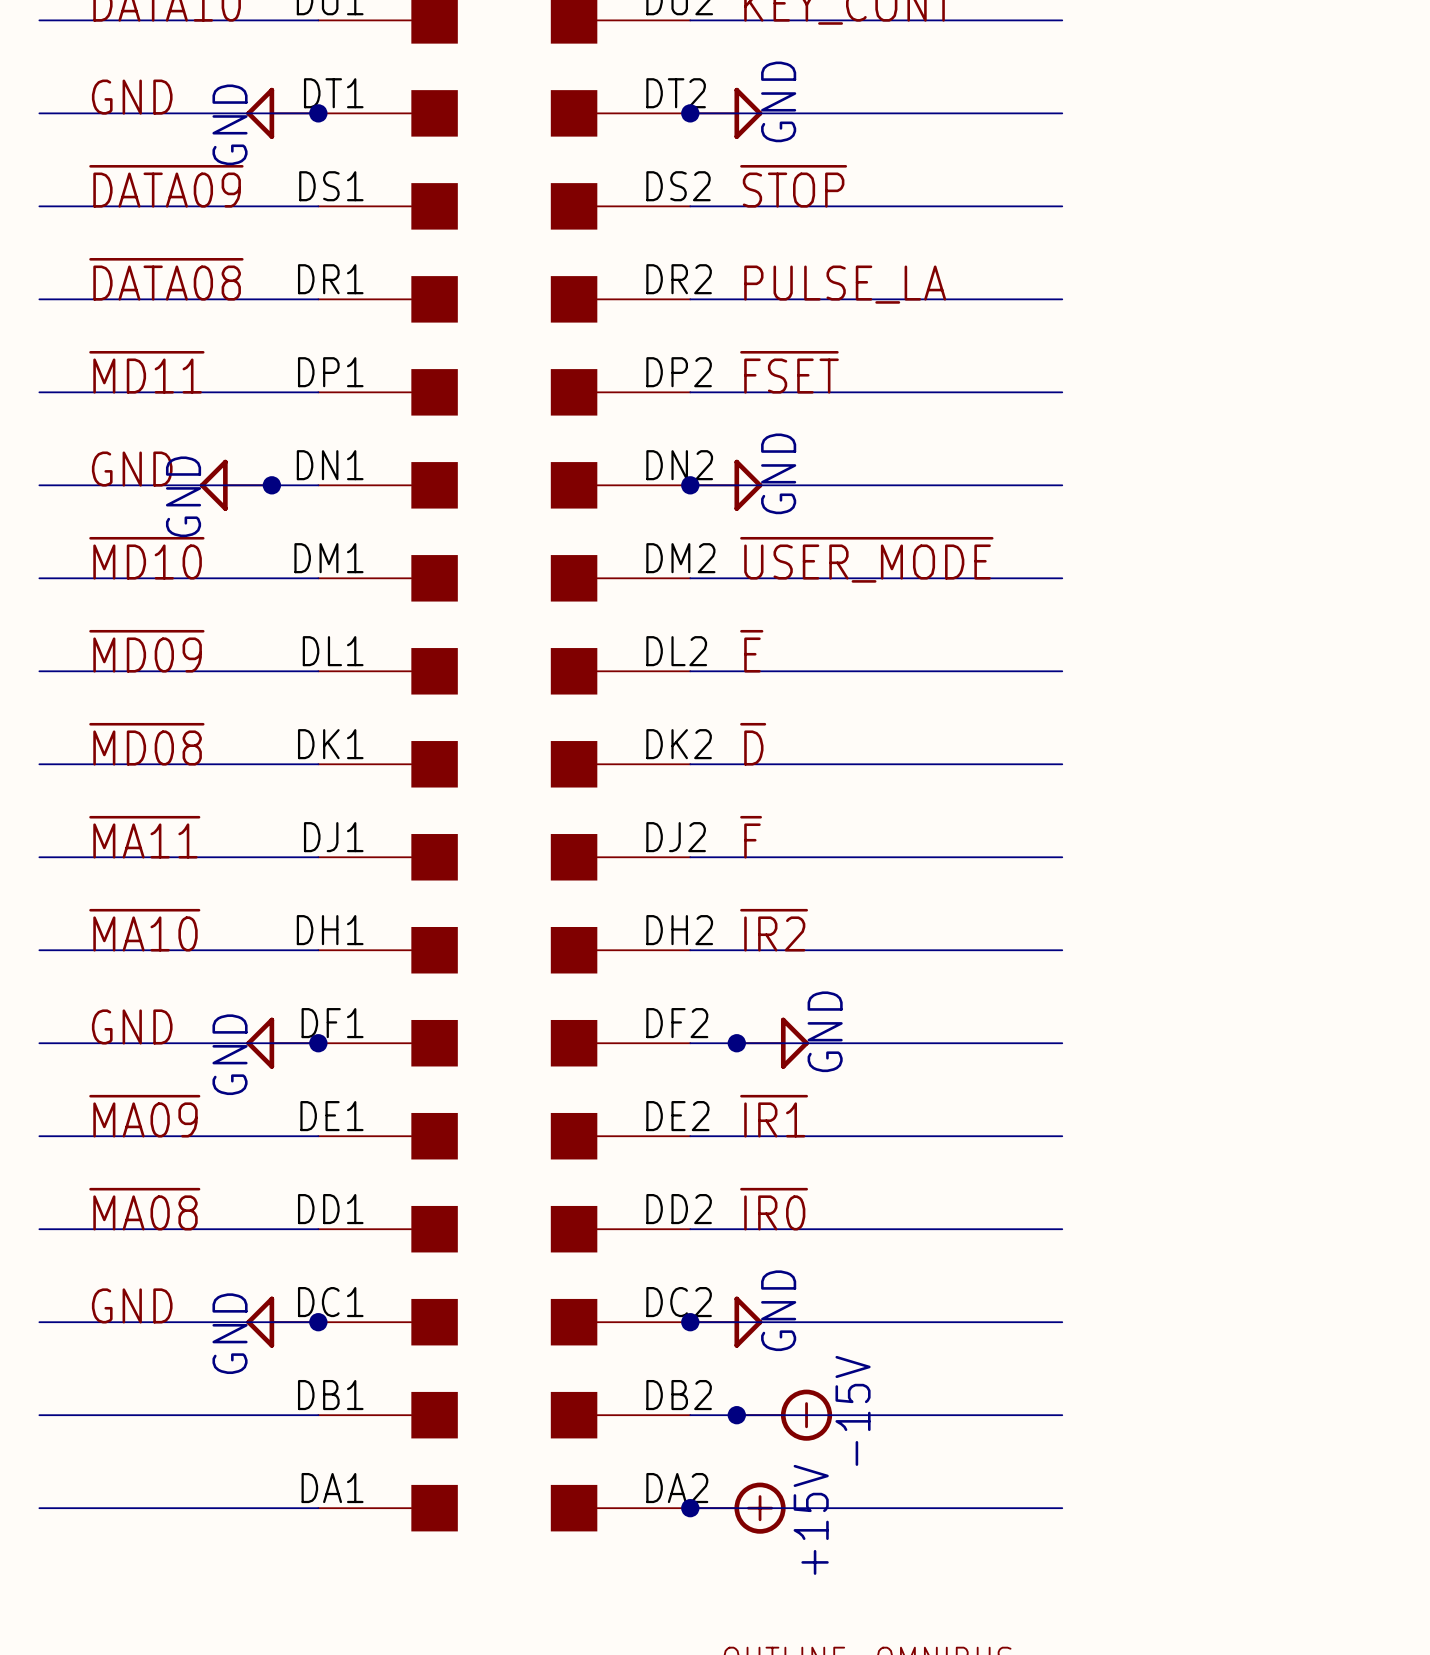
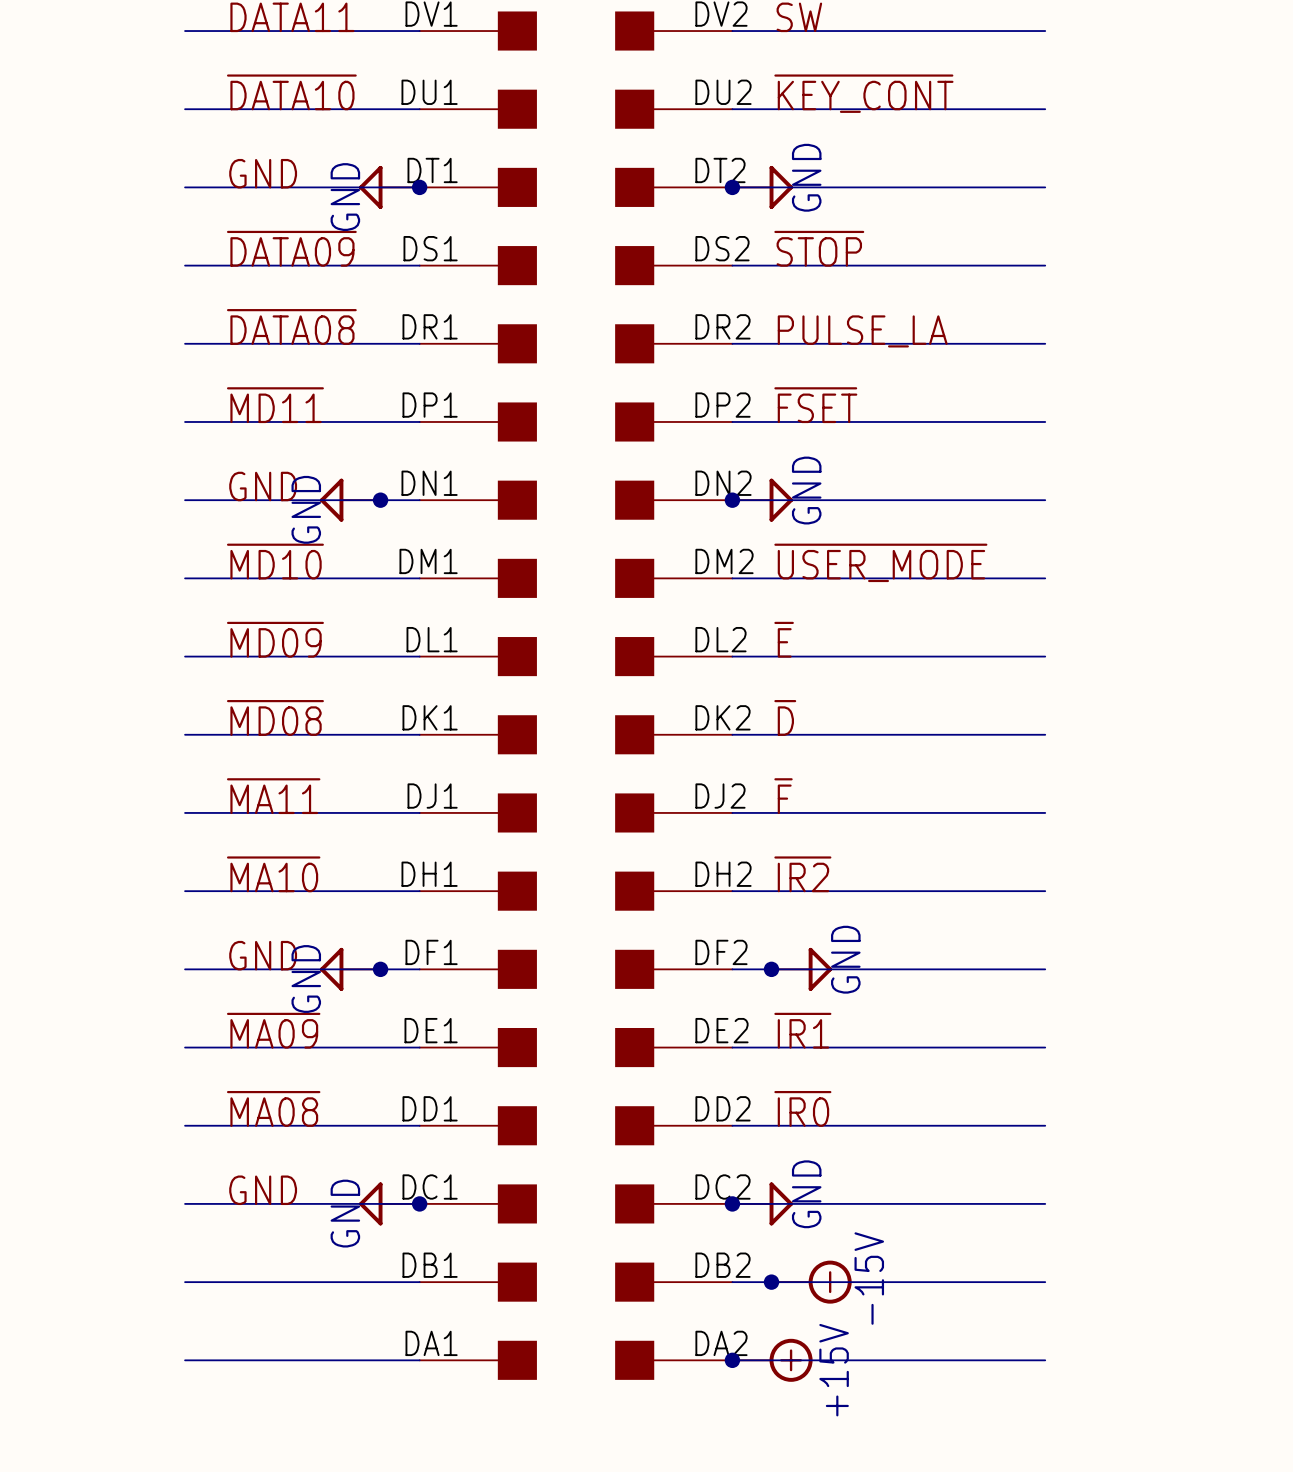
power symbol position: GND (282, 1043) -> GND (350, 969)
junction position: (318, 1043) -> (380, 969)

